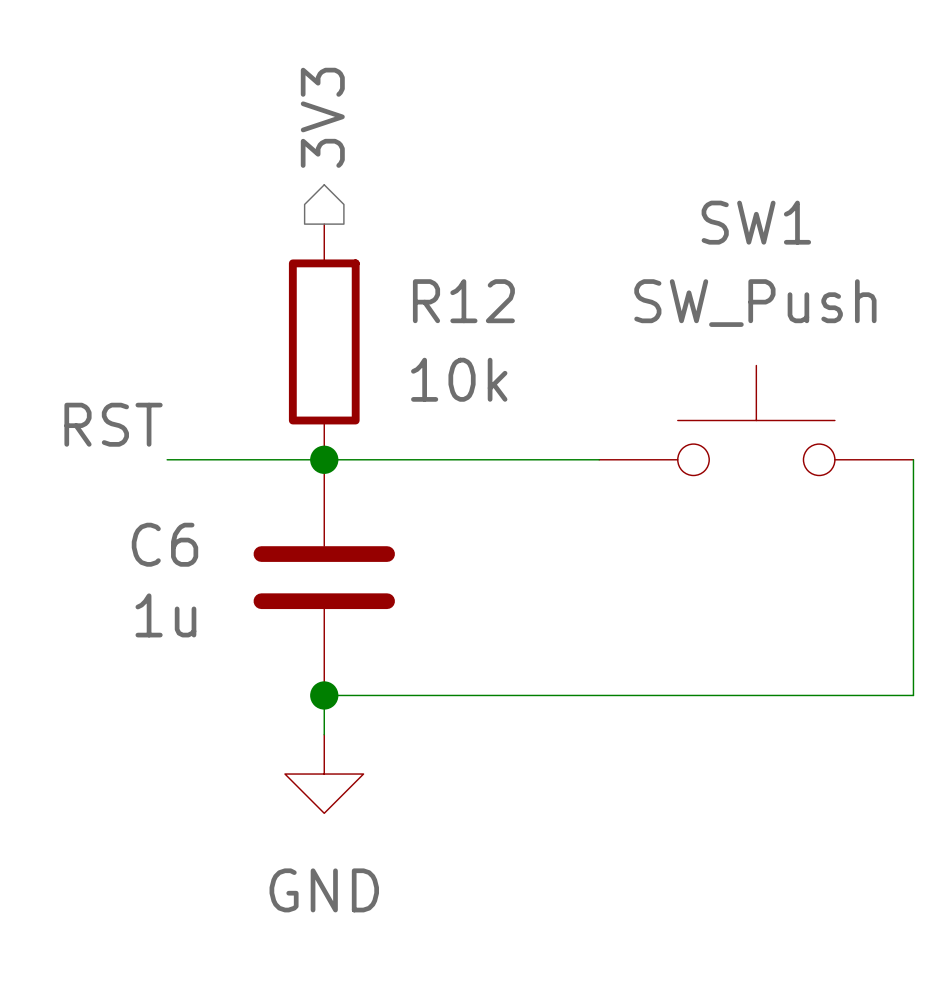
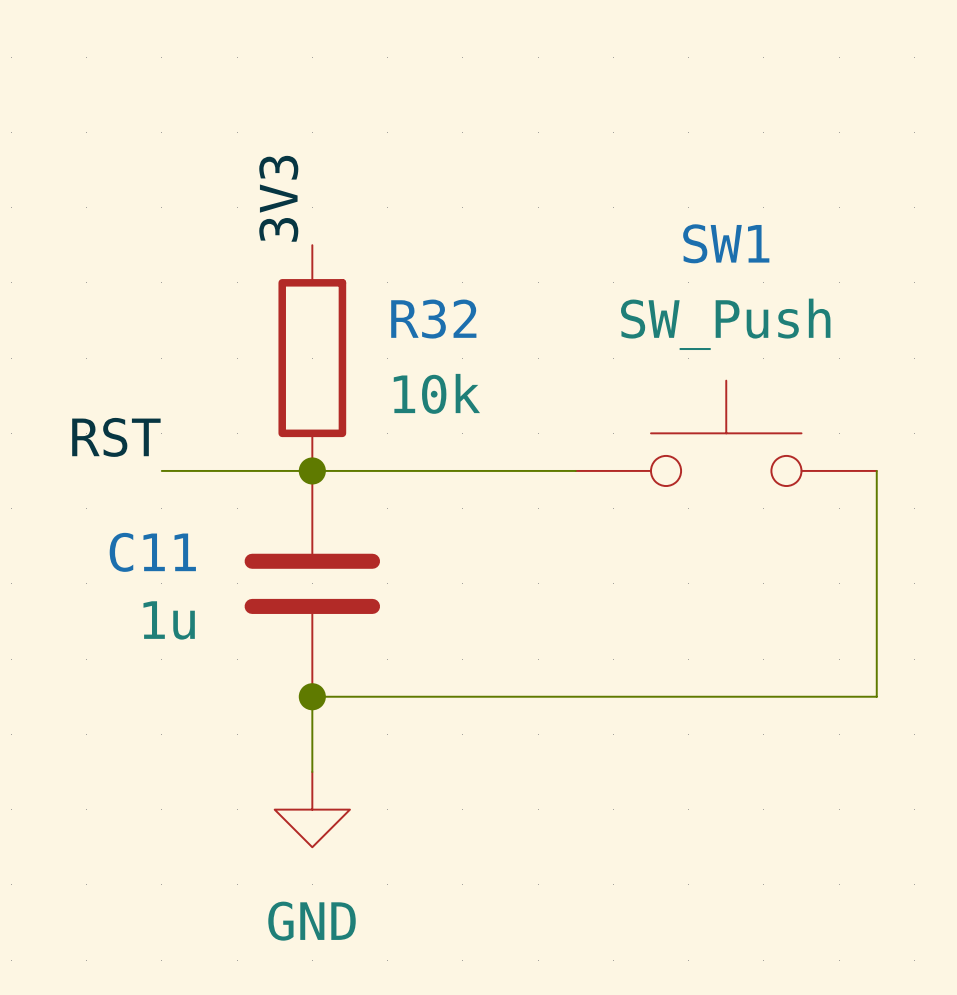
hierarchical label: 3V3 (322, 117) -> none
label: none -> 3V3 (278, 198)
R12 name: R12 (463, 301) -> R32 (433, 319)
C6 name: C6 (164, 544) -> C11 (152, 552)
power symbol position: GND (324, 774) -> GND (312, 809)

